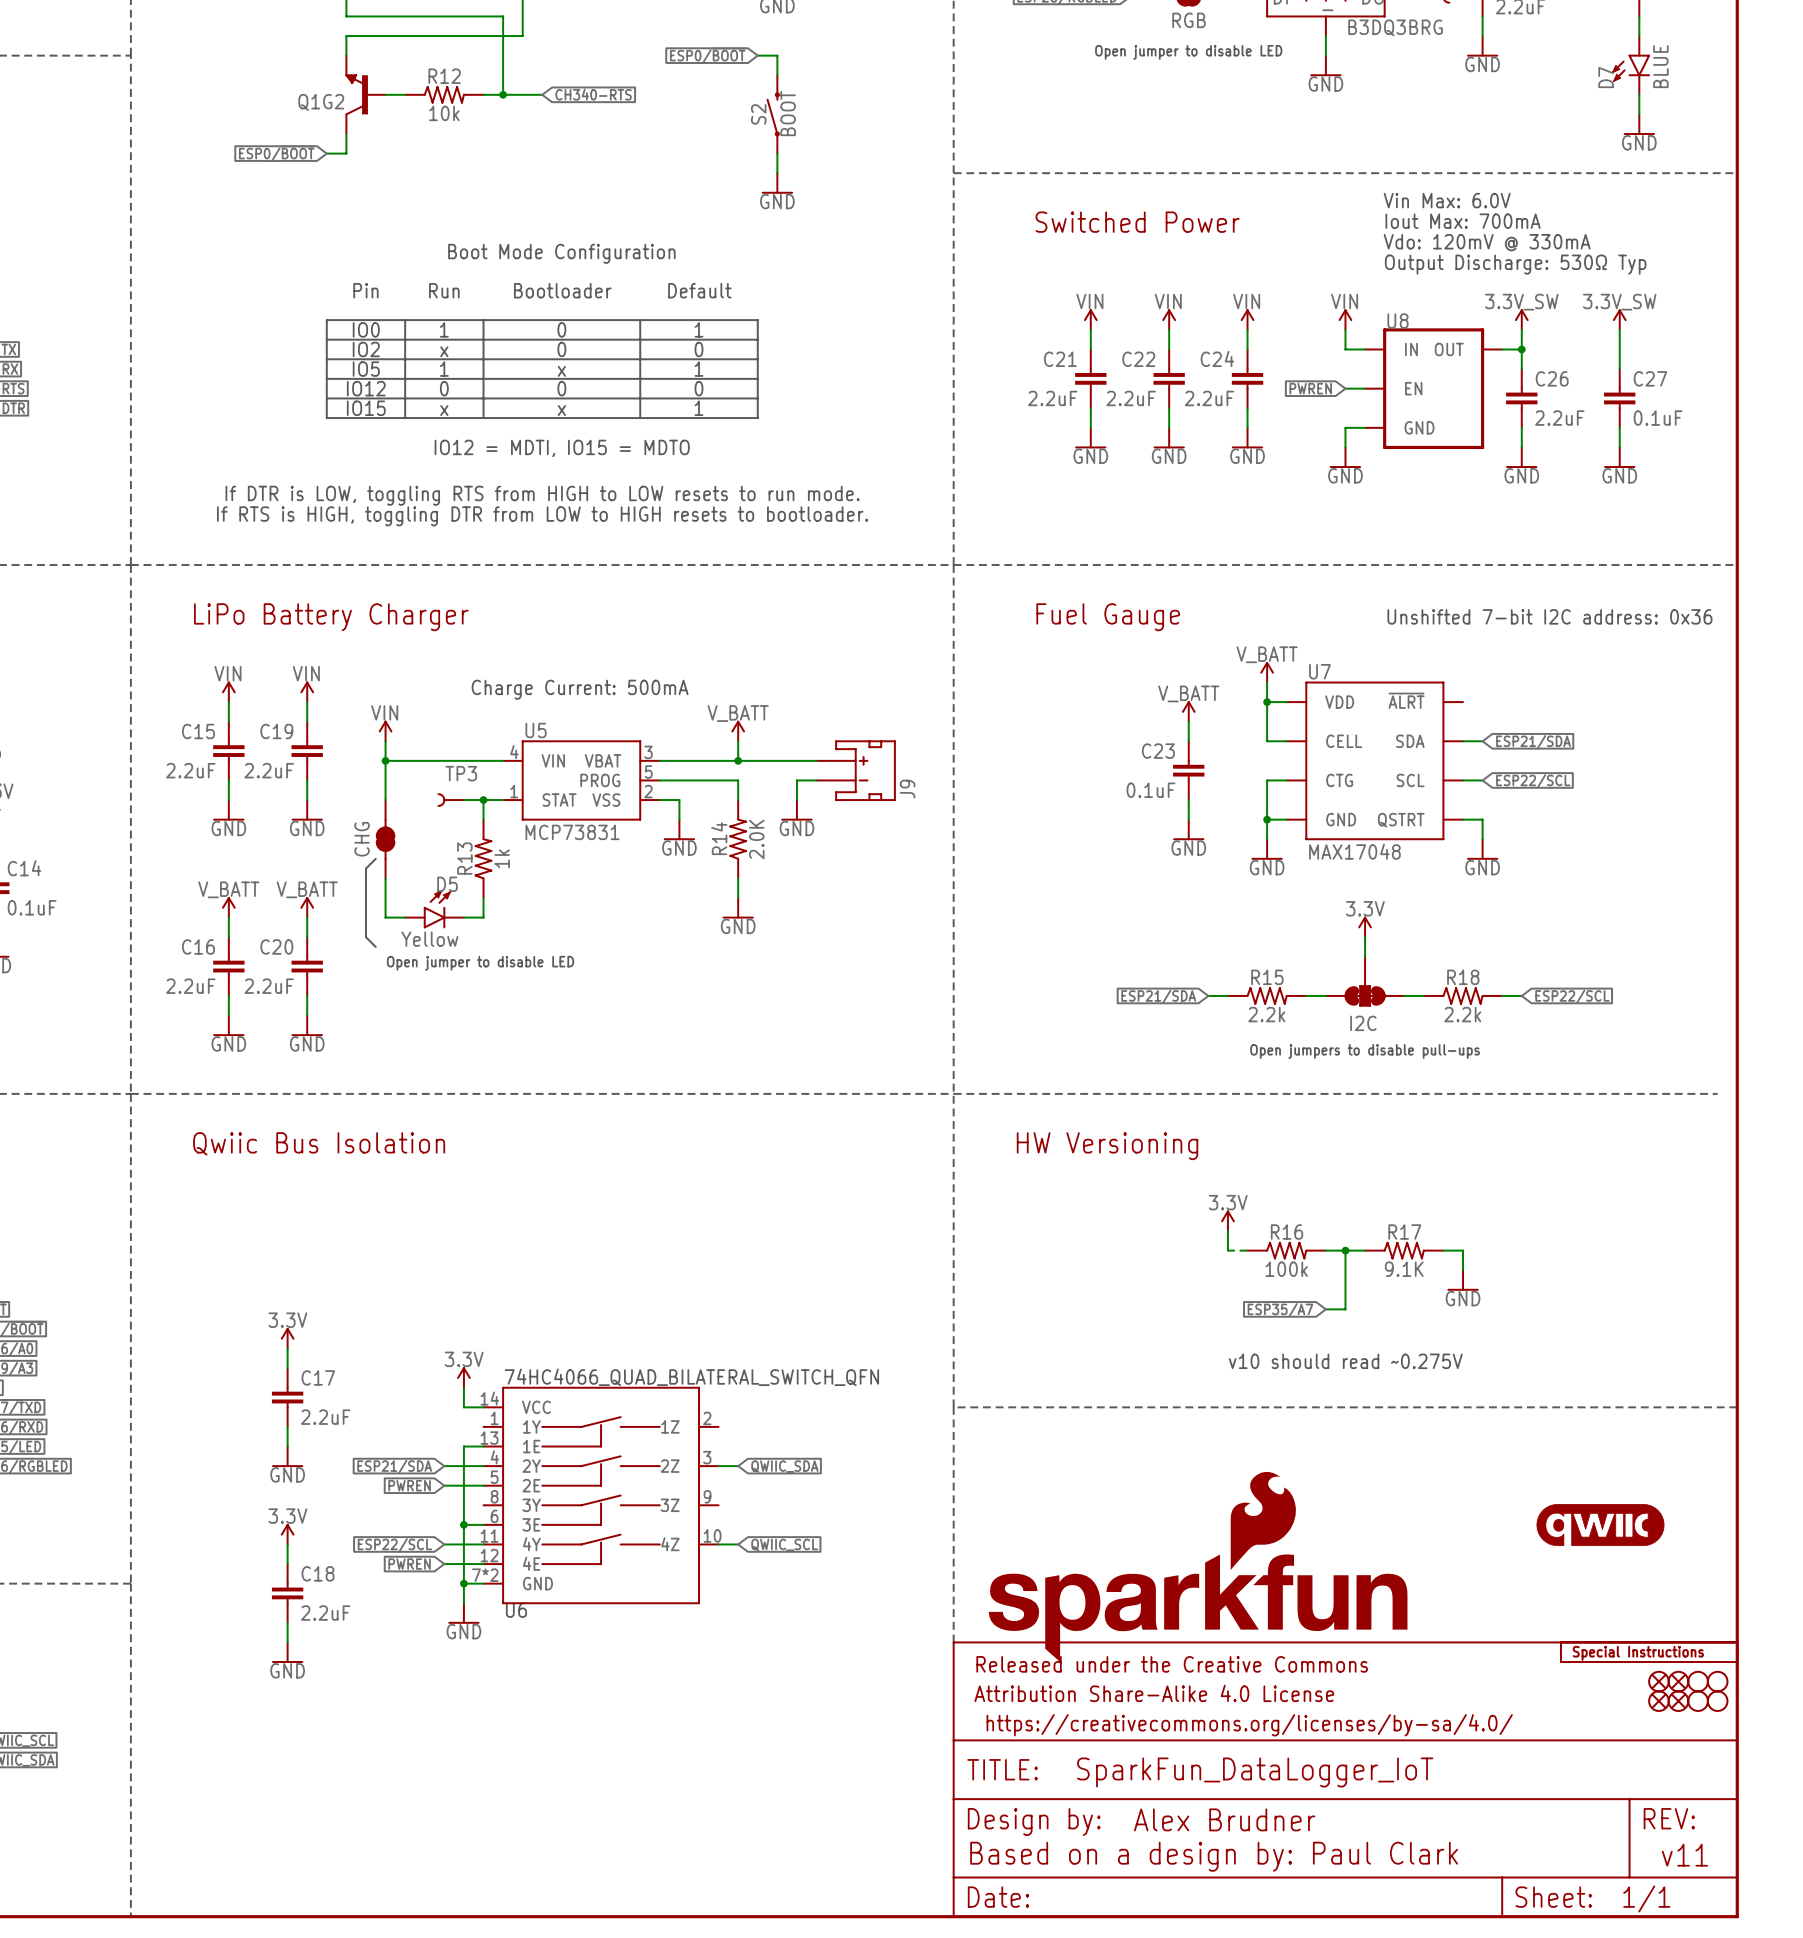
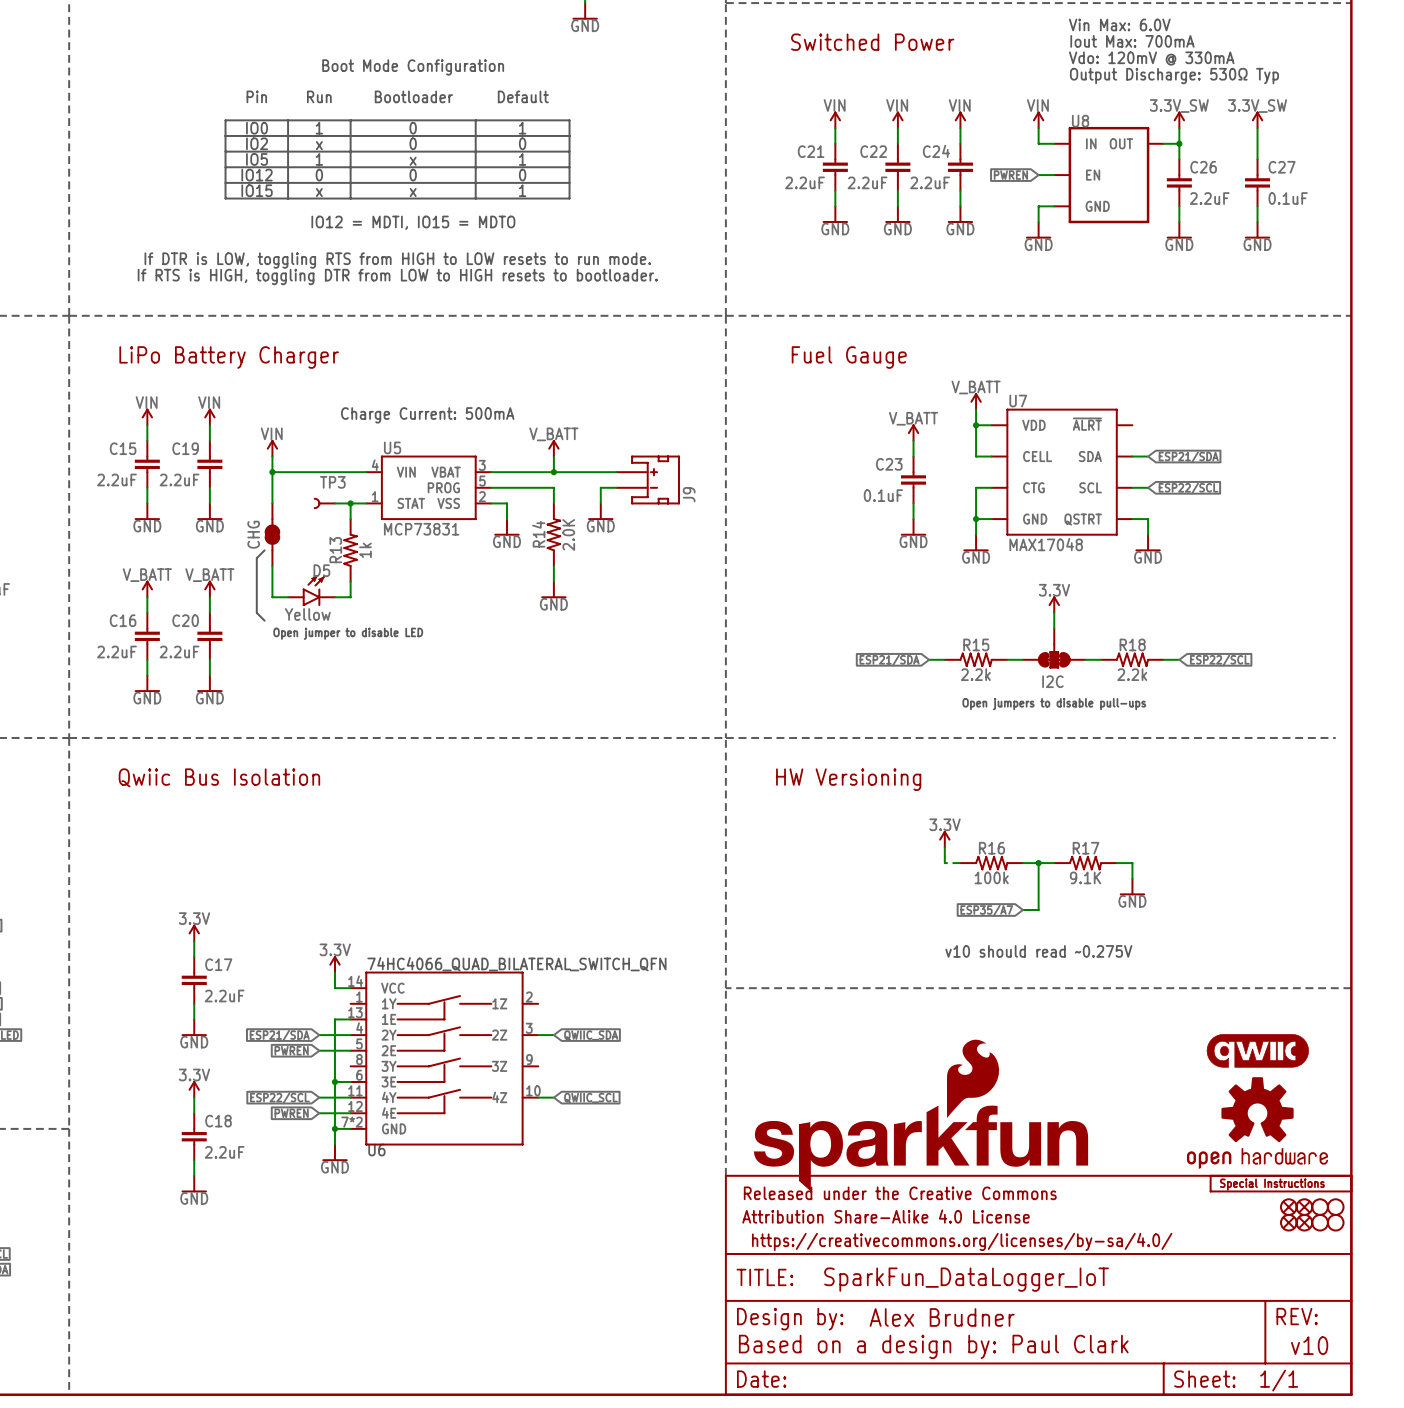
text: Unshifted 7-bit I2C address: 0x36 (1549, 616) -> none
part position: (1600, 1525) -> (1257, 1050)
part: none -> (1257, 1122)
part text: v11 (1684, 1855) -> v10 (1309, 1345)

